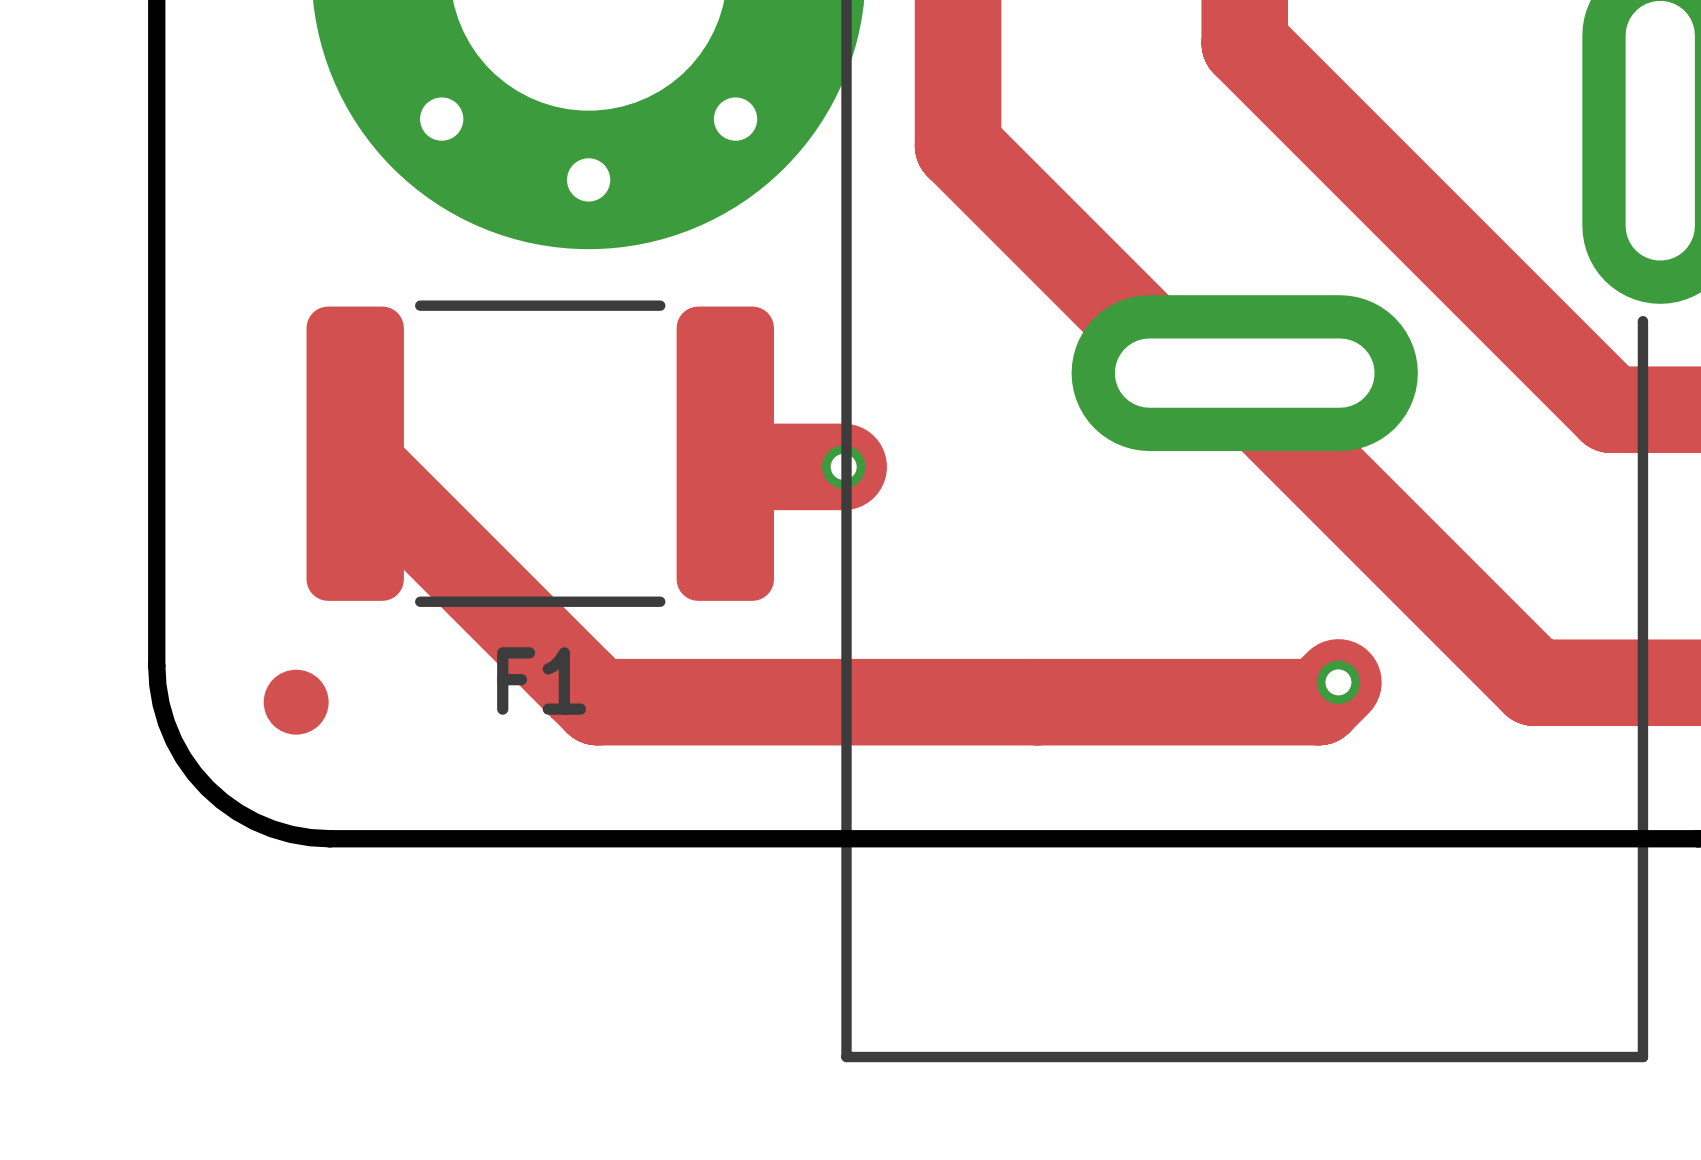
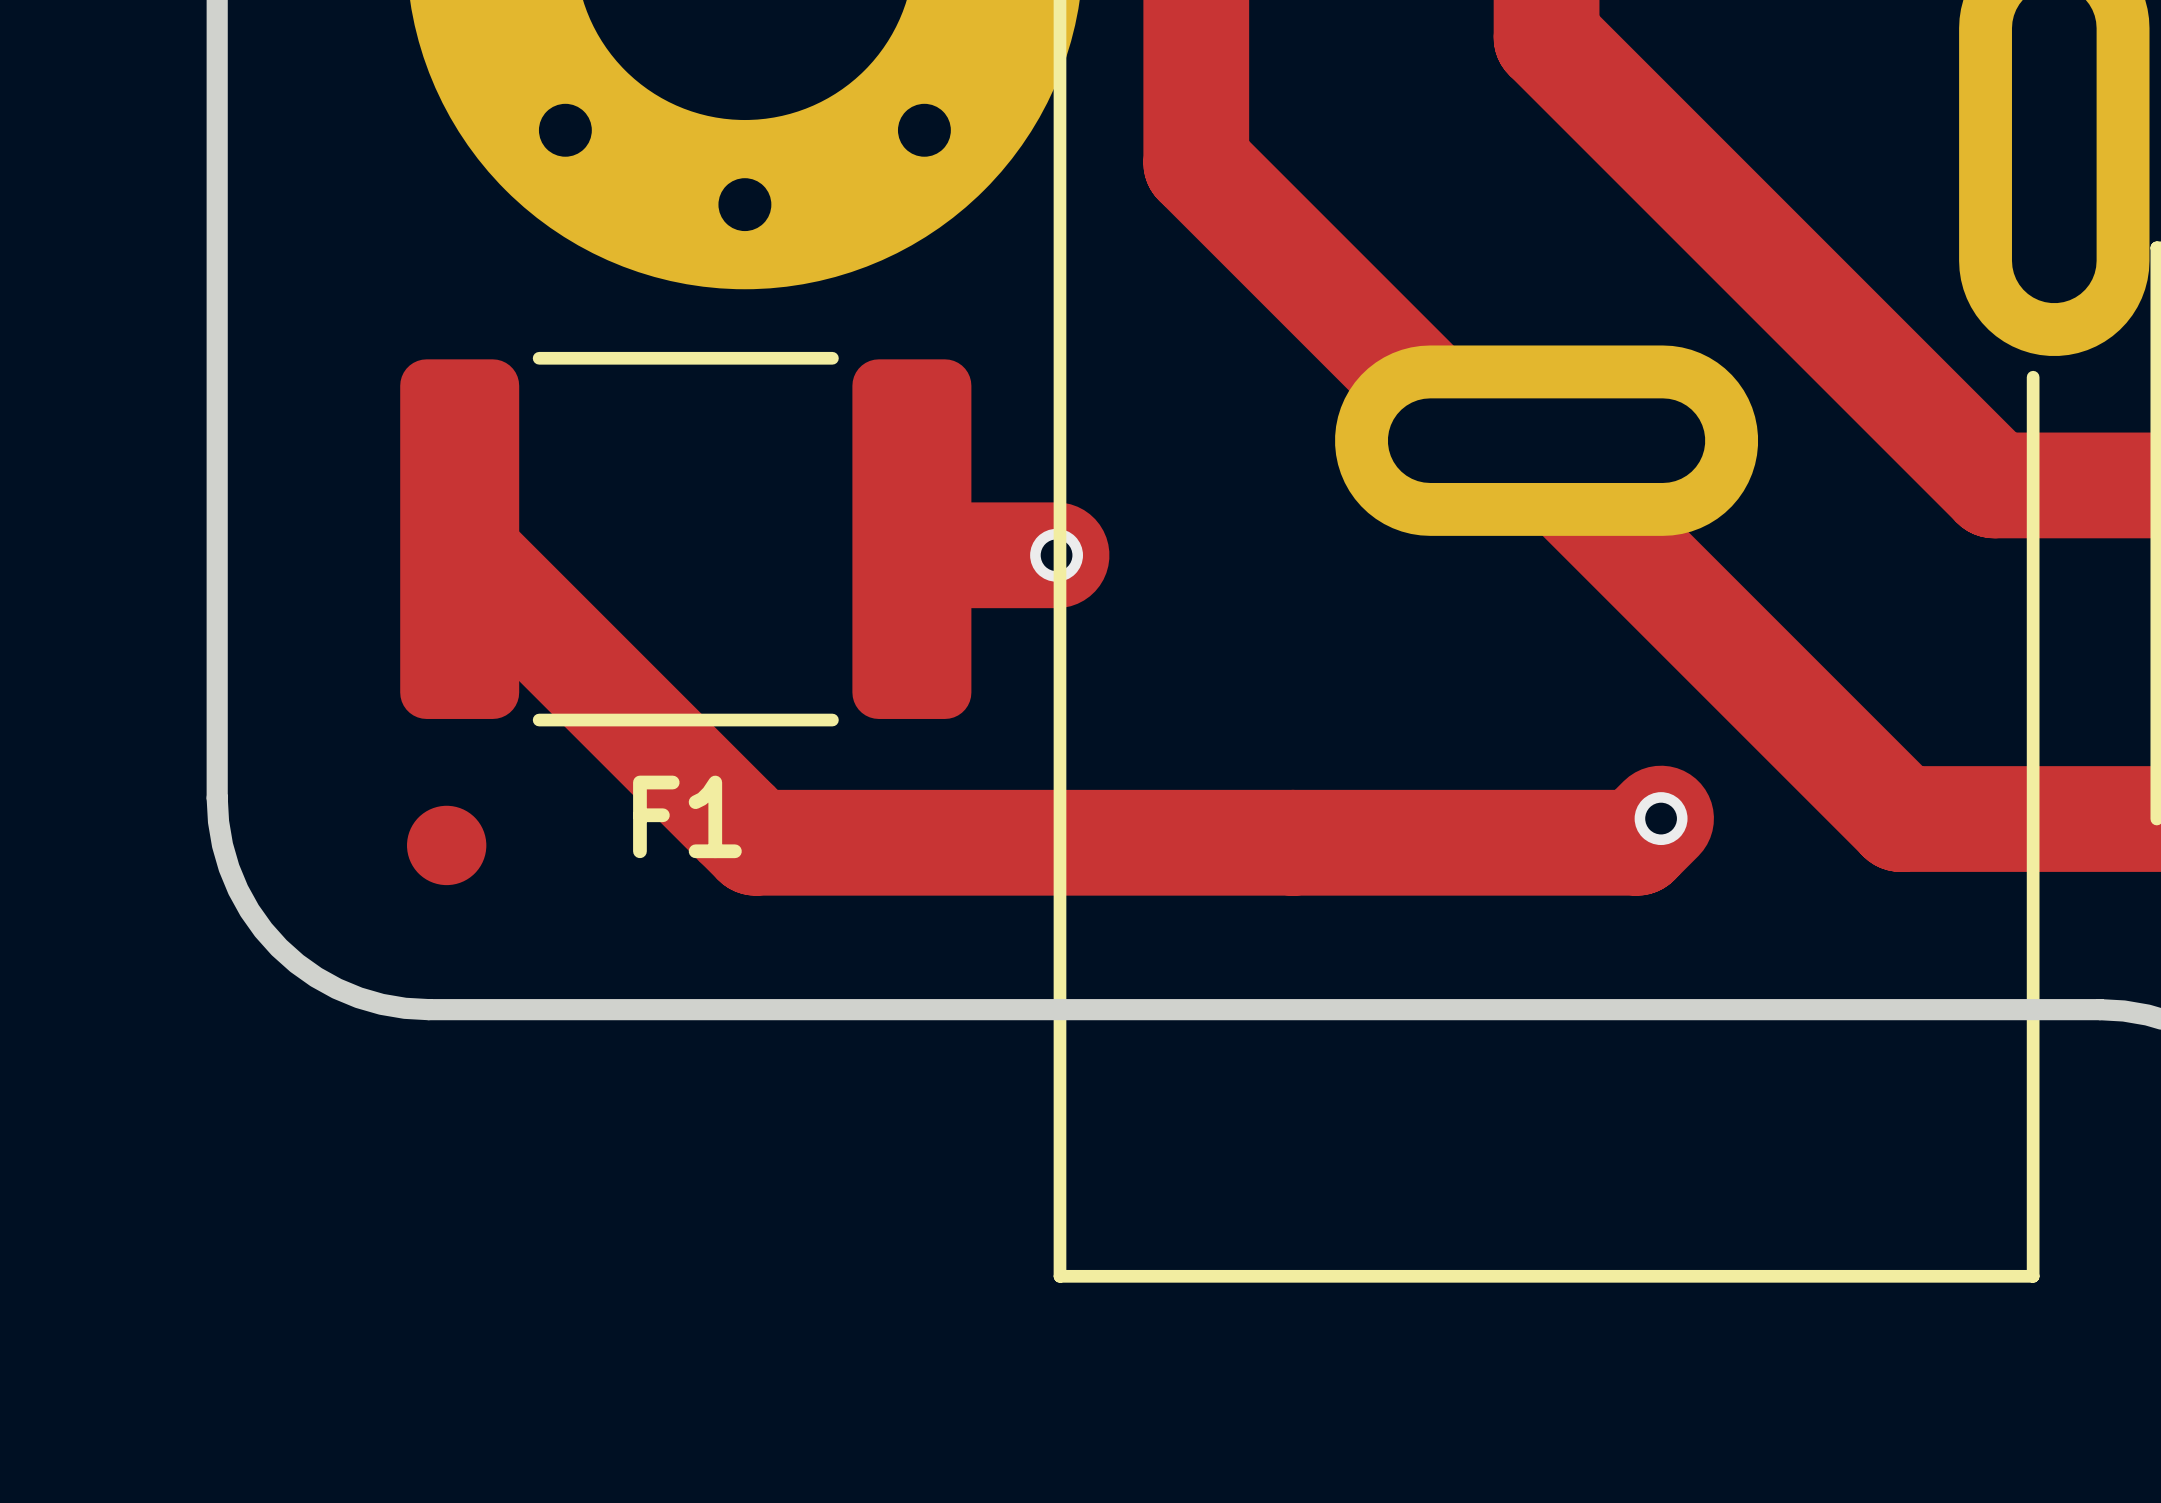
part position: (296, 702) -> (446, 845)

